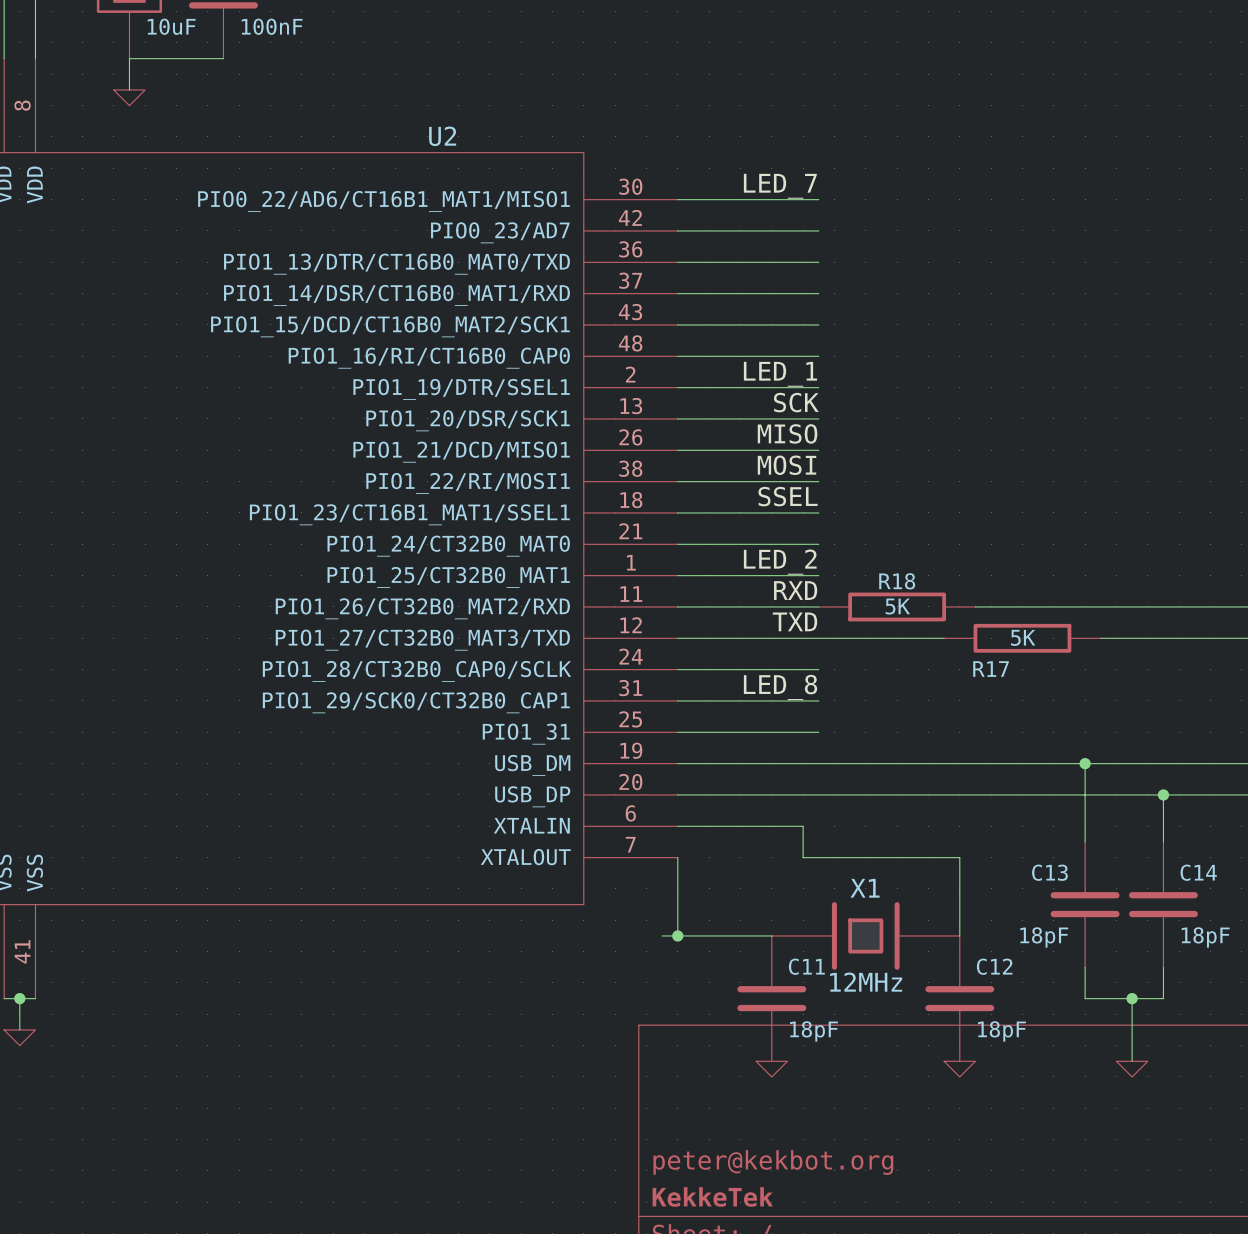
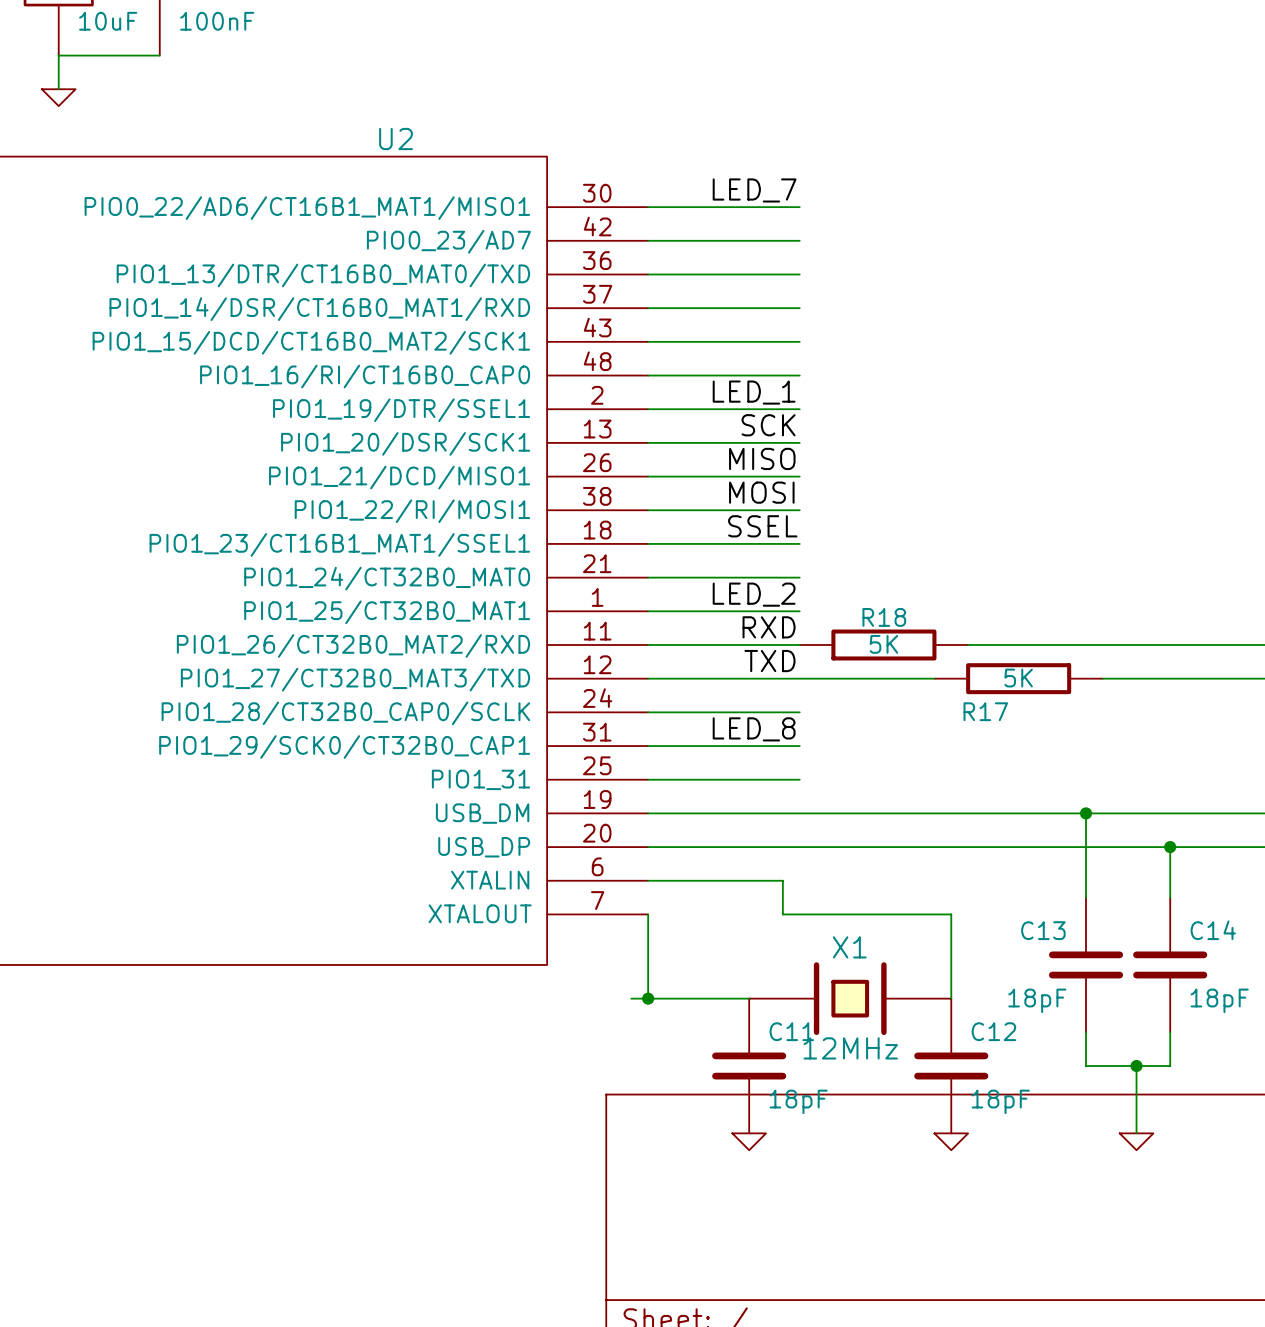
title block: peter@kekbot.org (773, 1162) -> none
title block: KekkeTek (712, 1196) -> none

